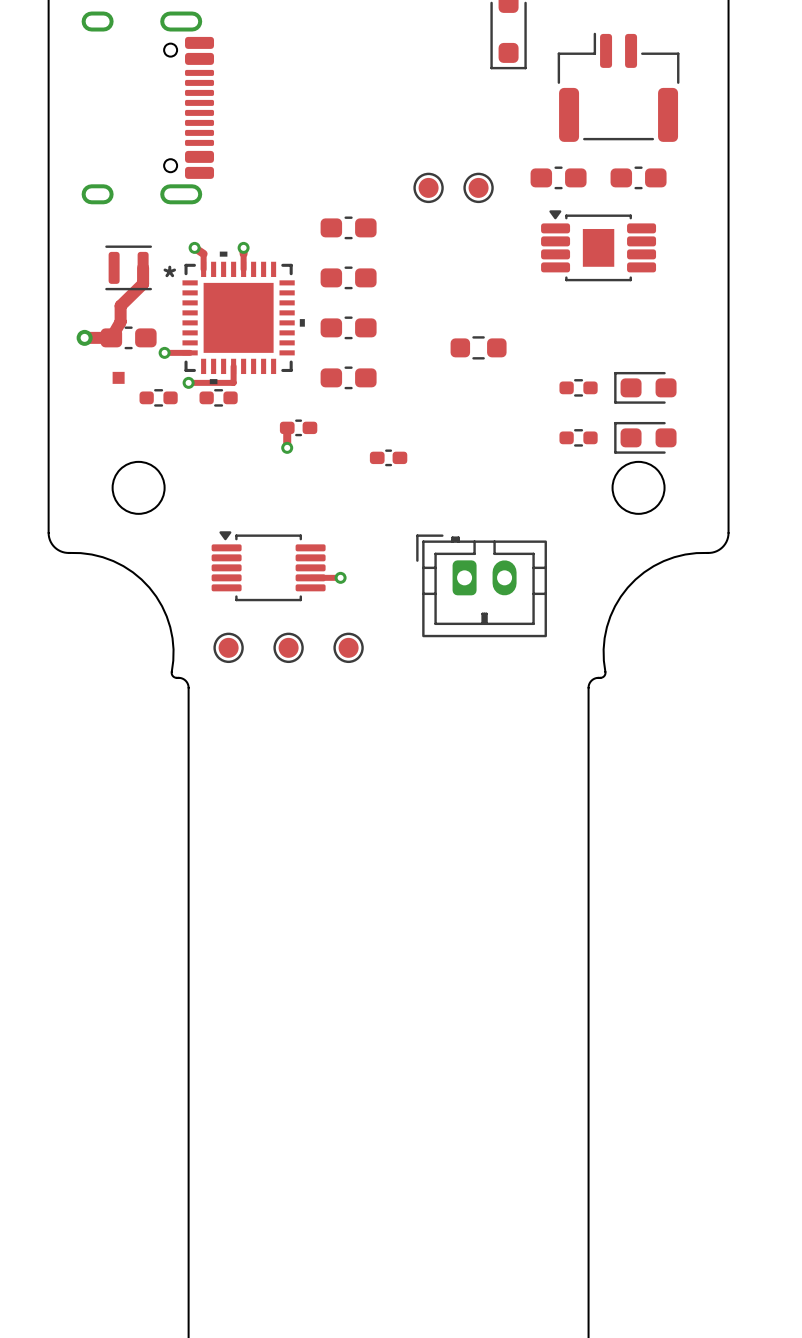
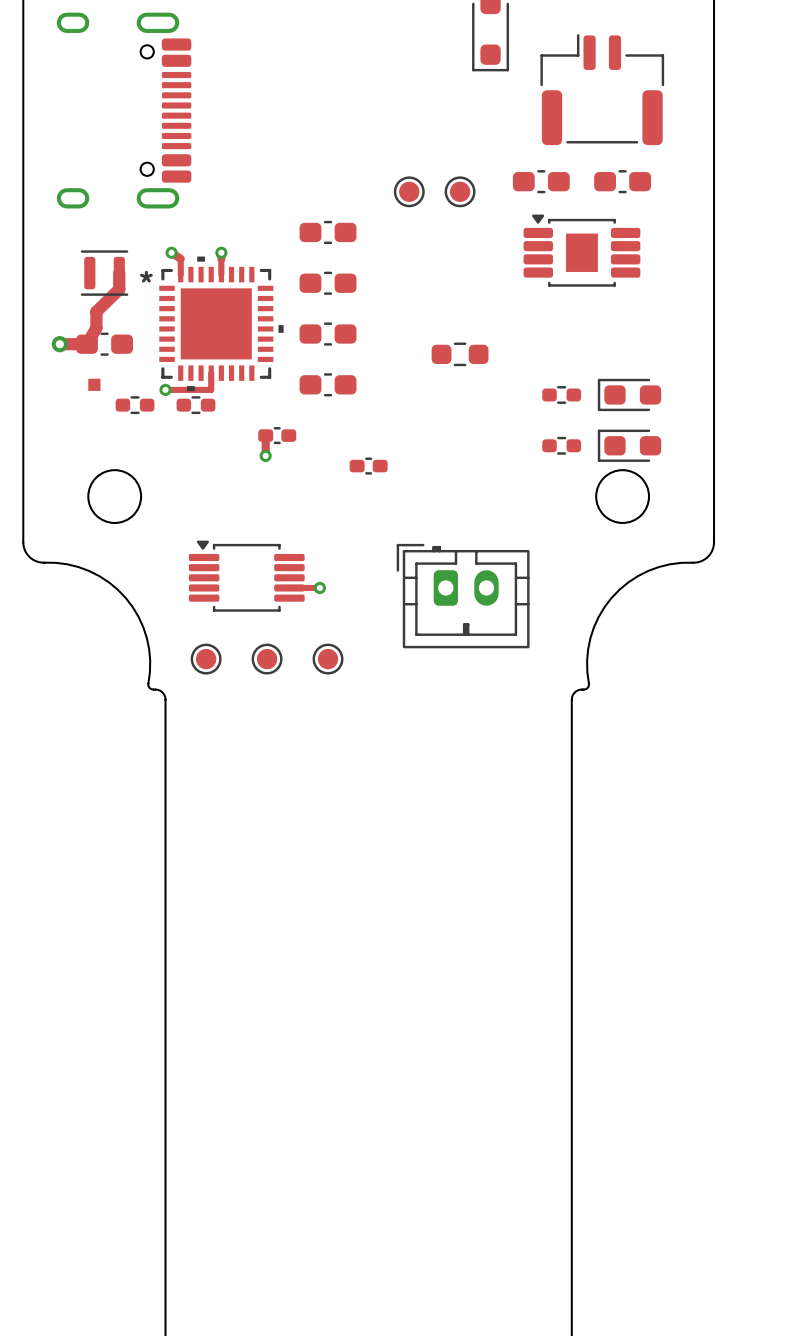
track: (164, 352) (190, 352) -> none
via: (164, 352) -> none

